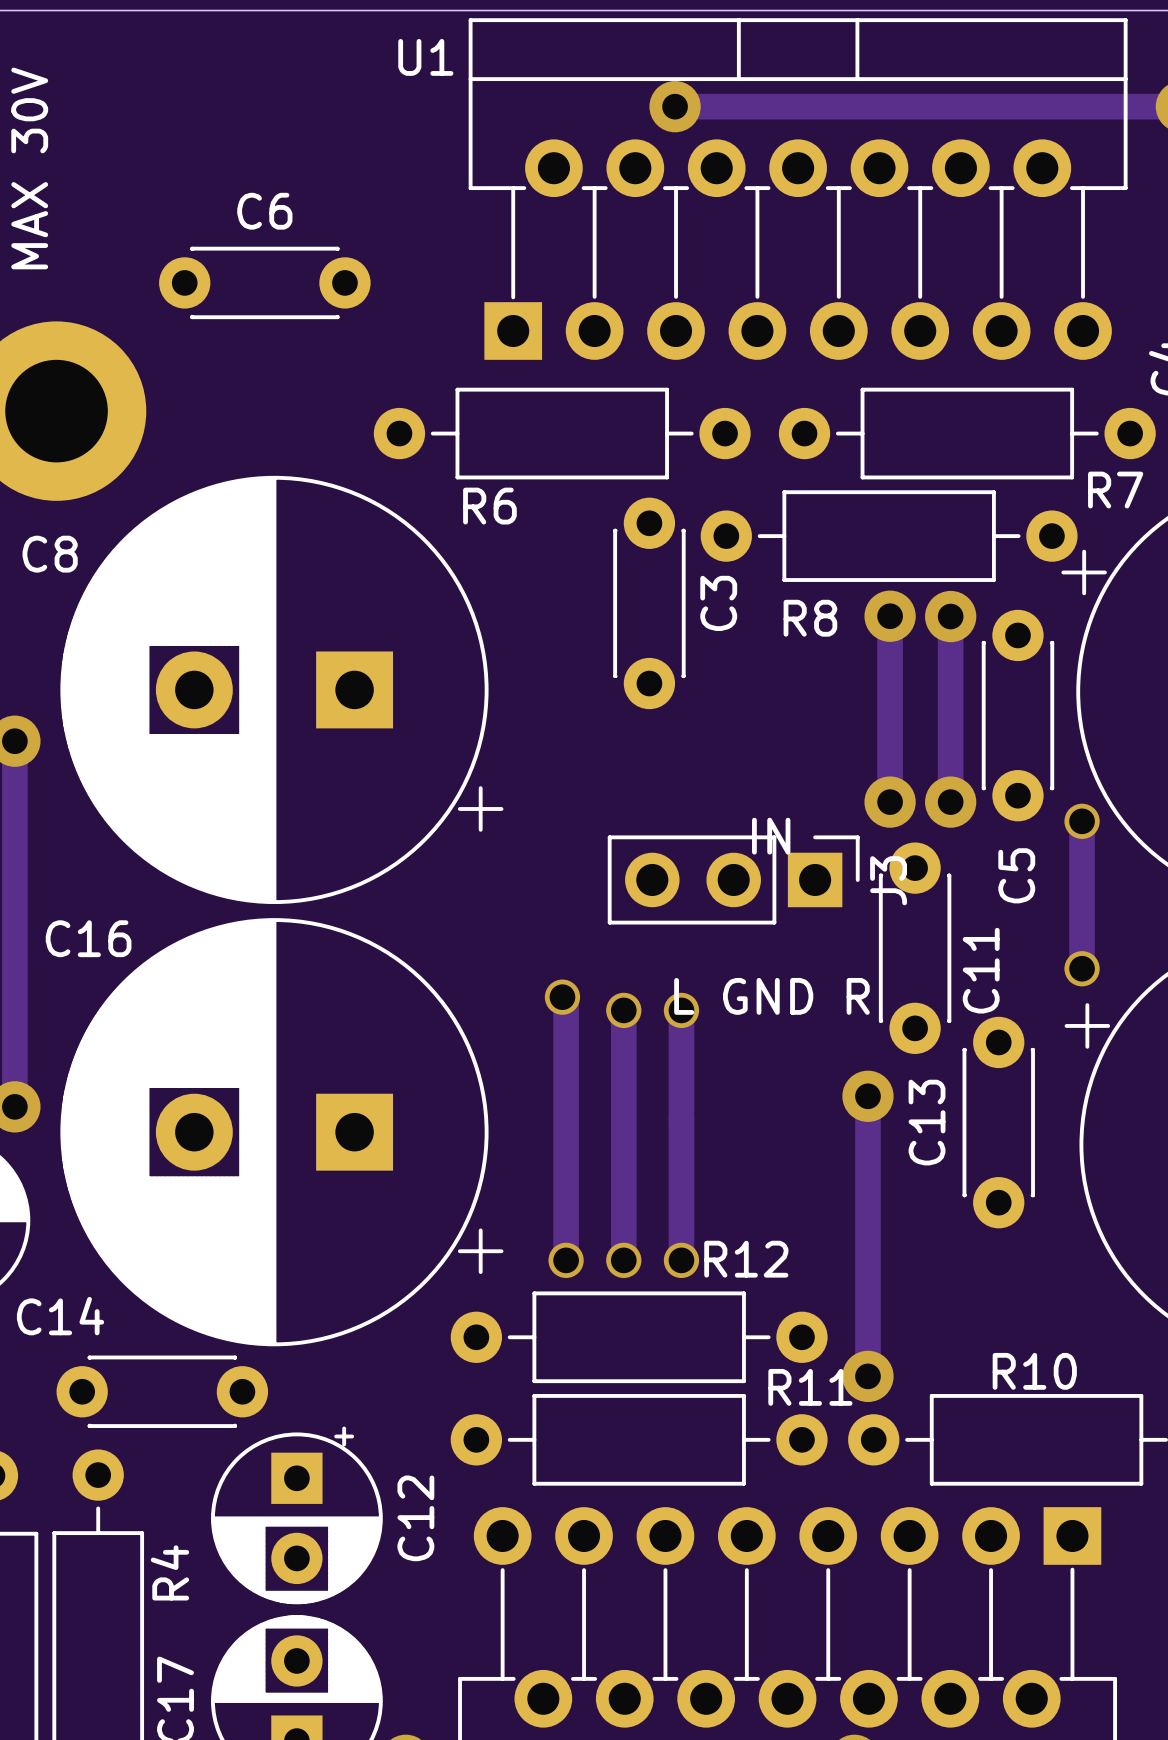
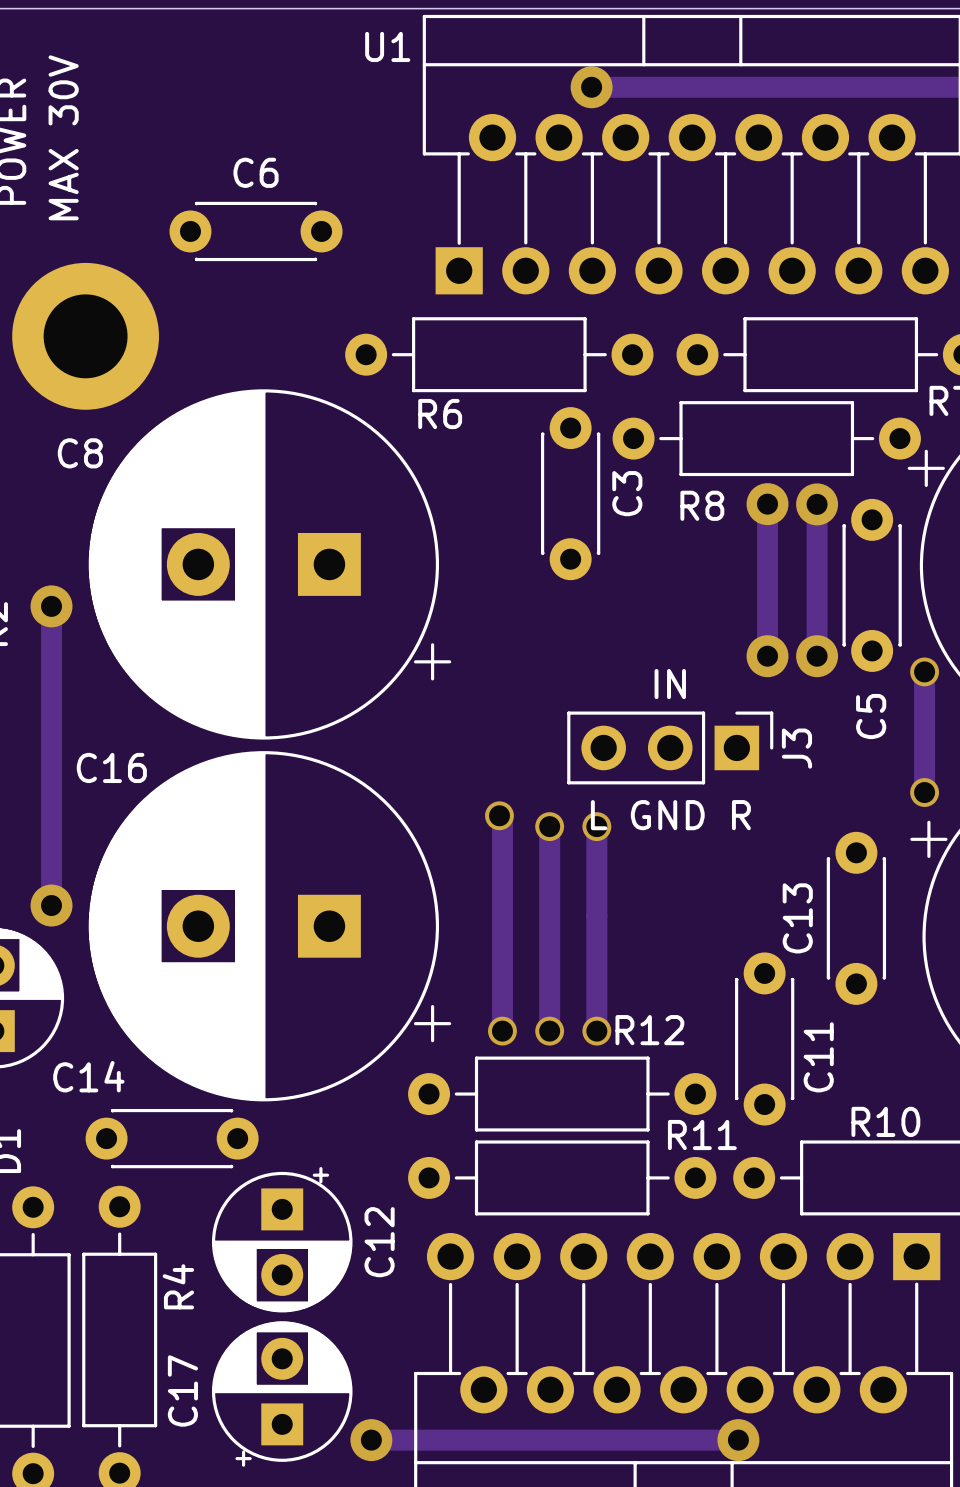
J3 position: (733, 879) -> (670, 747)
C11 position: (915, 948) -> (764, 1038)
track: (867, 1096) (867, 1376) -> none
via: (867, 1096) -> none
via: (867, 1376) -> none

